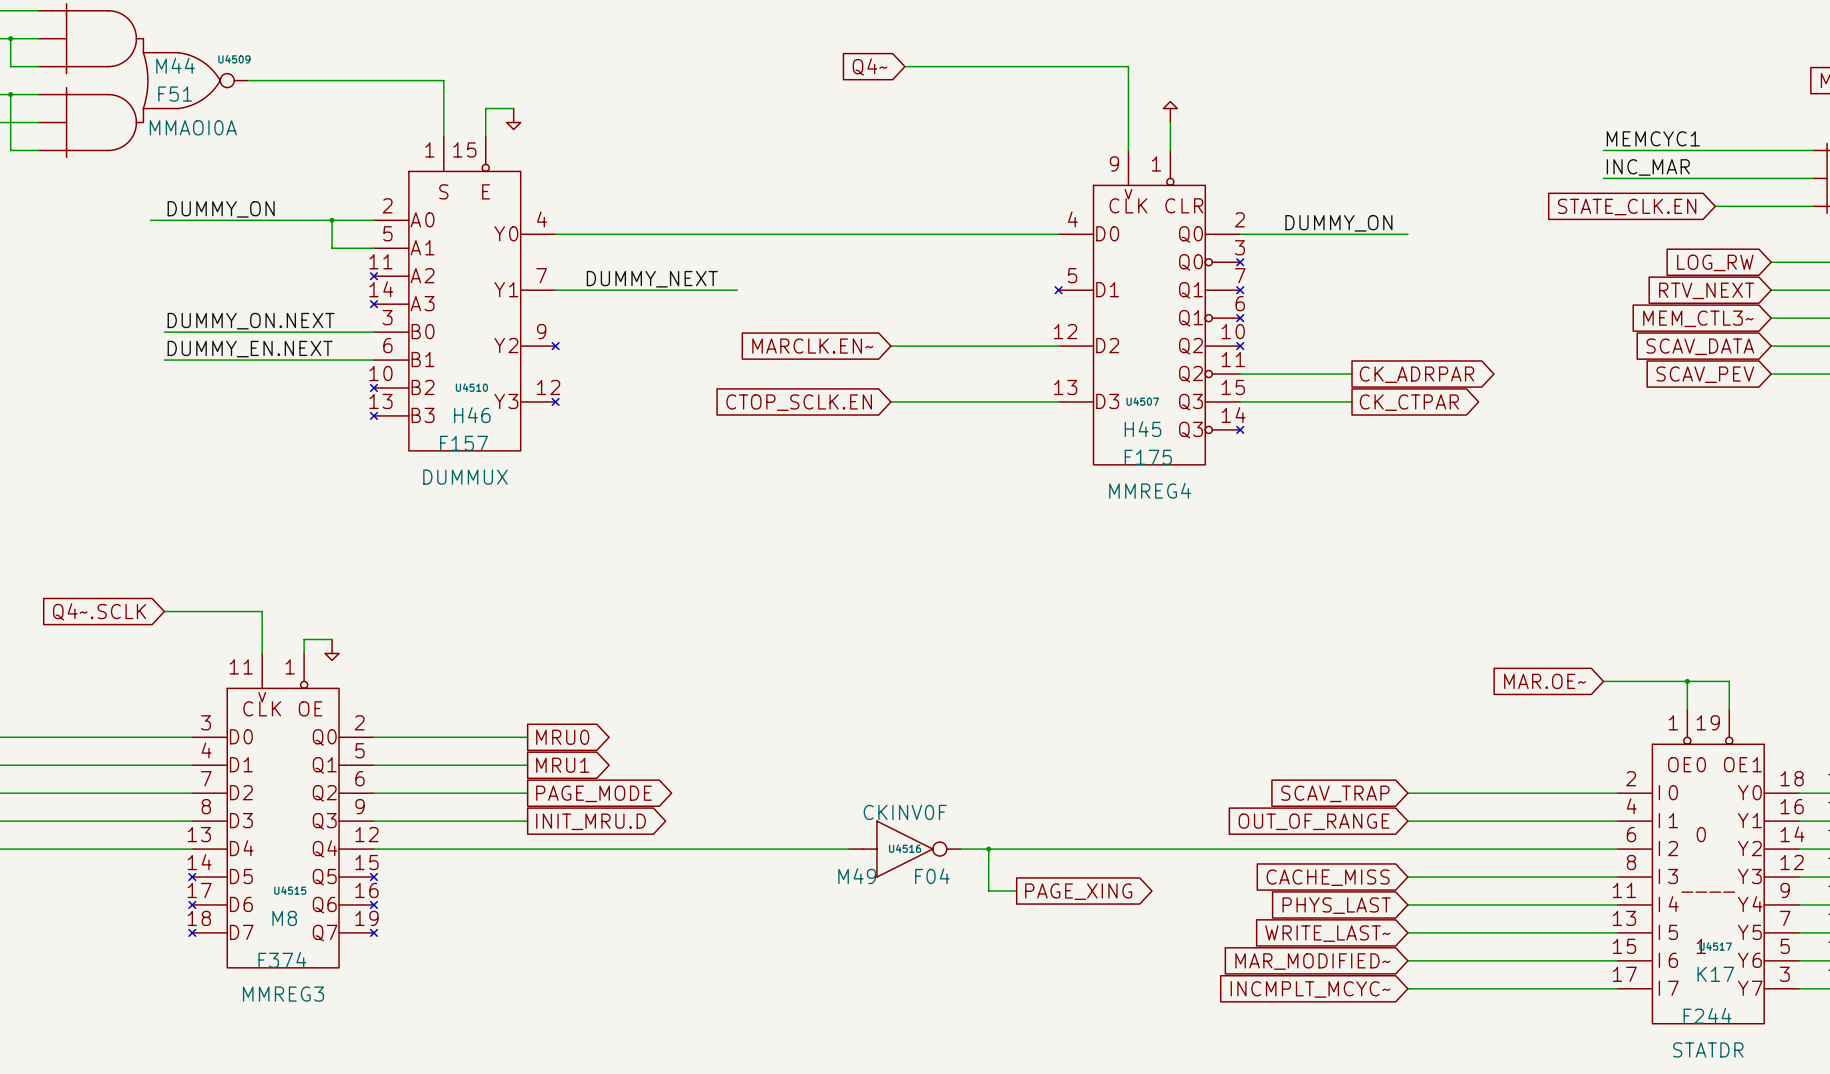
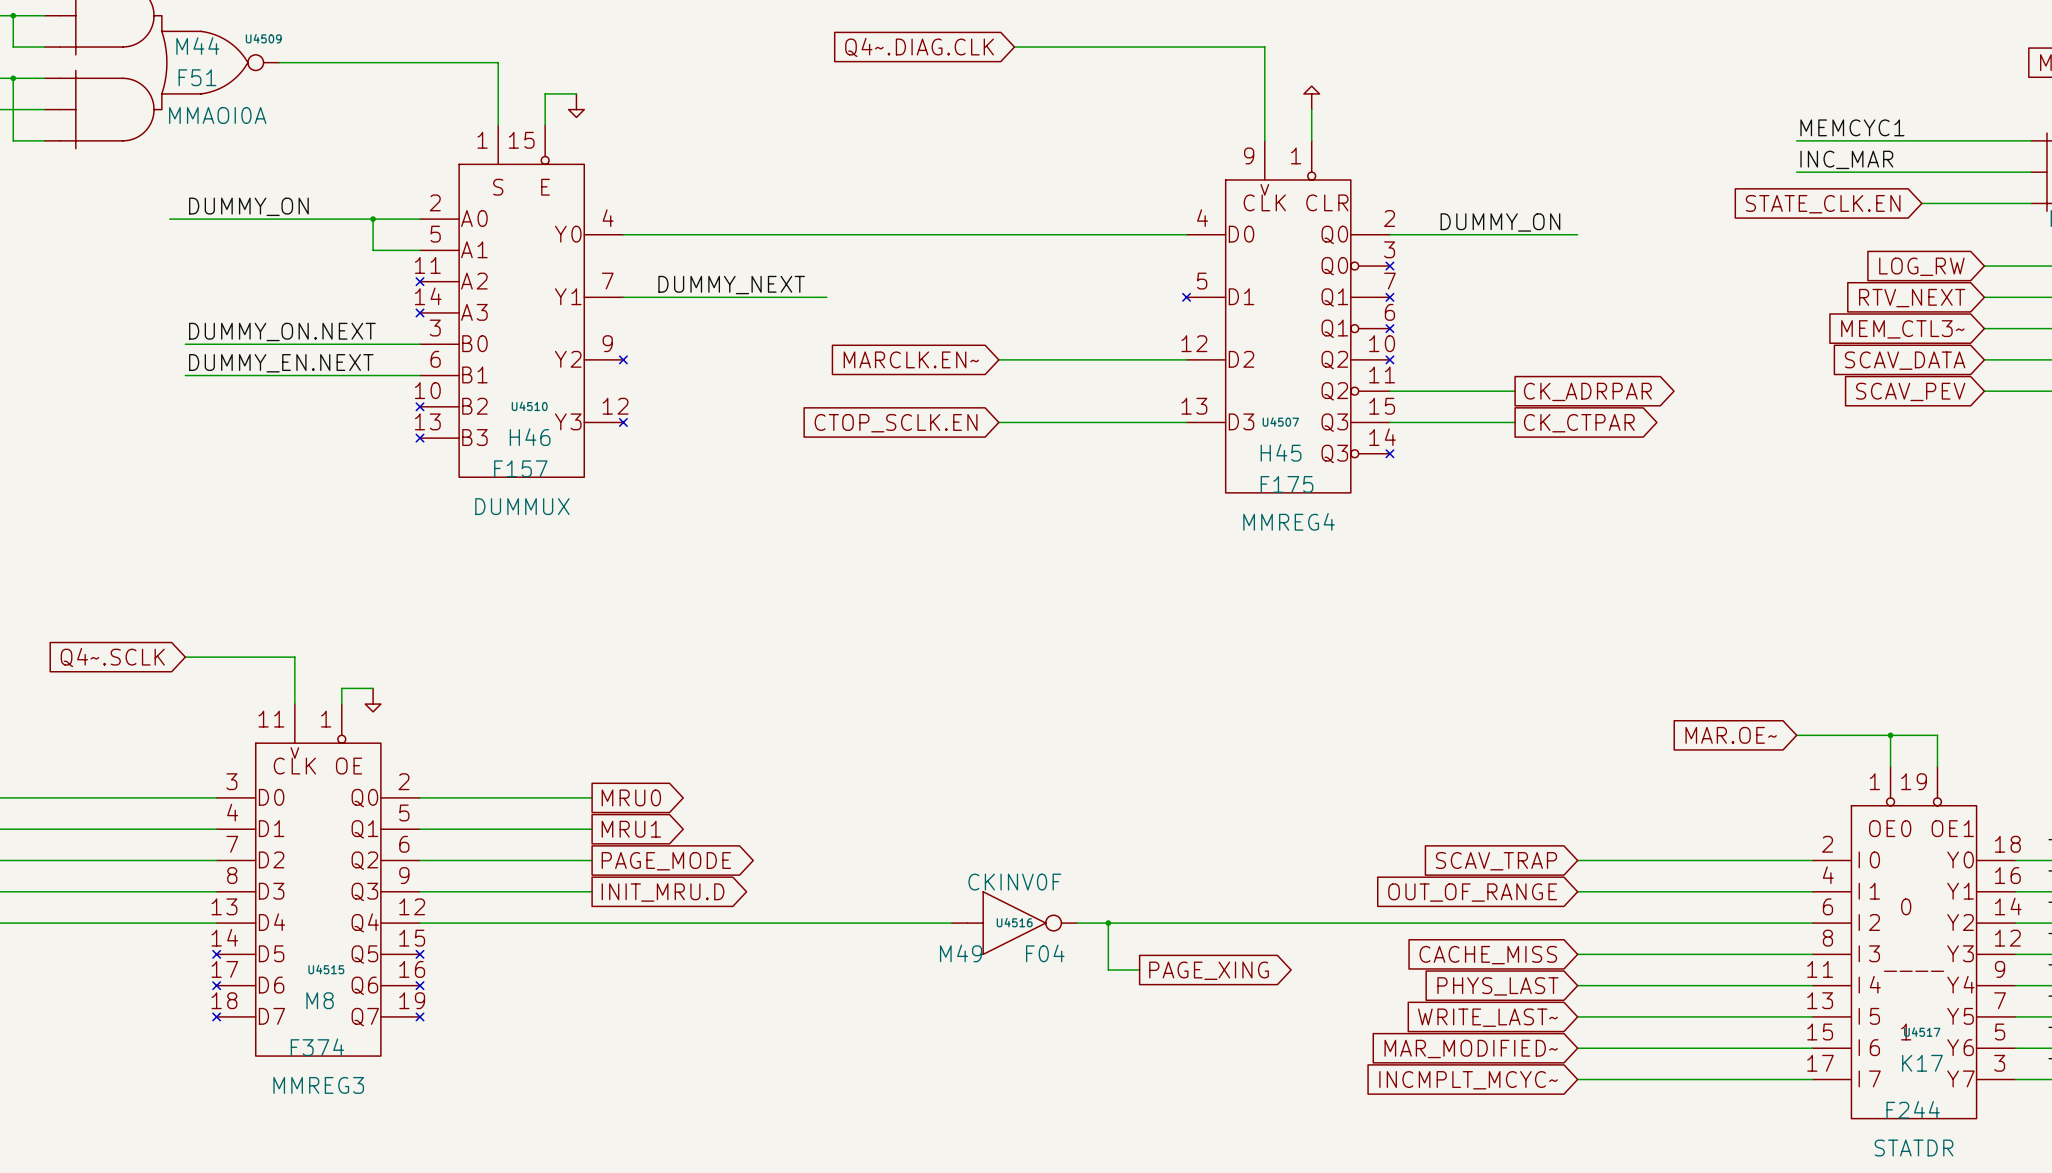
global label: Q4~ (870, 66) -> Q4~.DIAG.CLK (919, 47)

